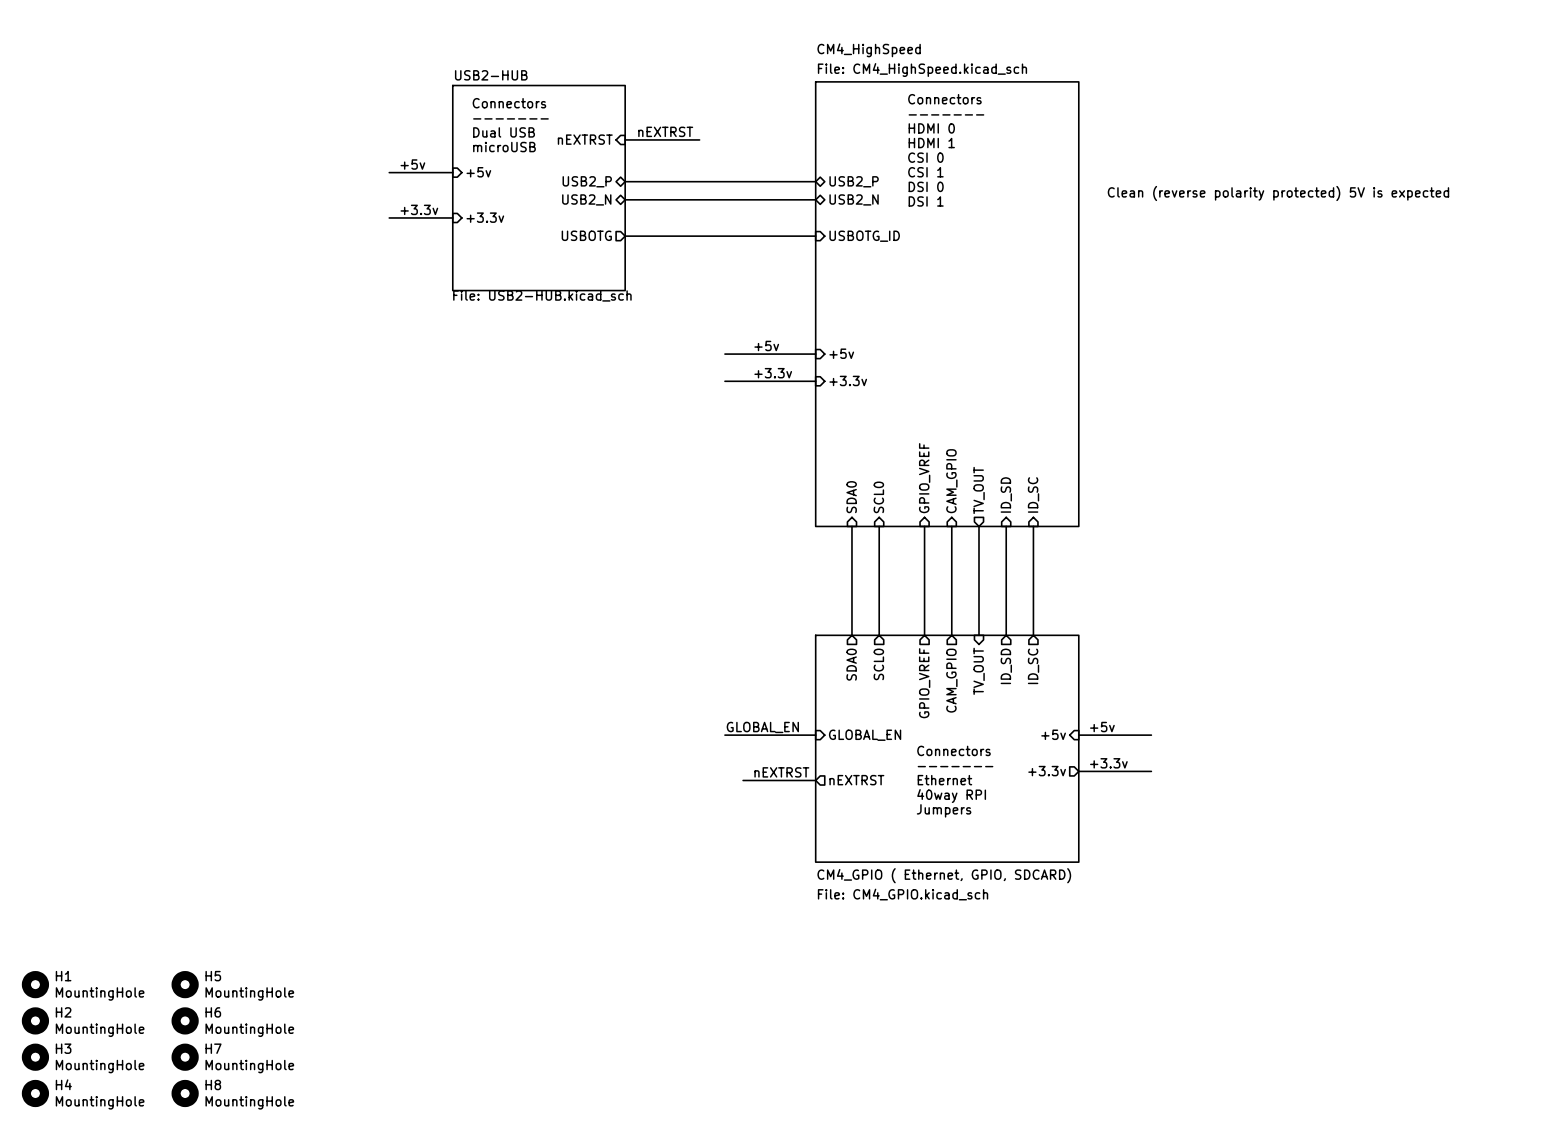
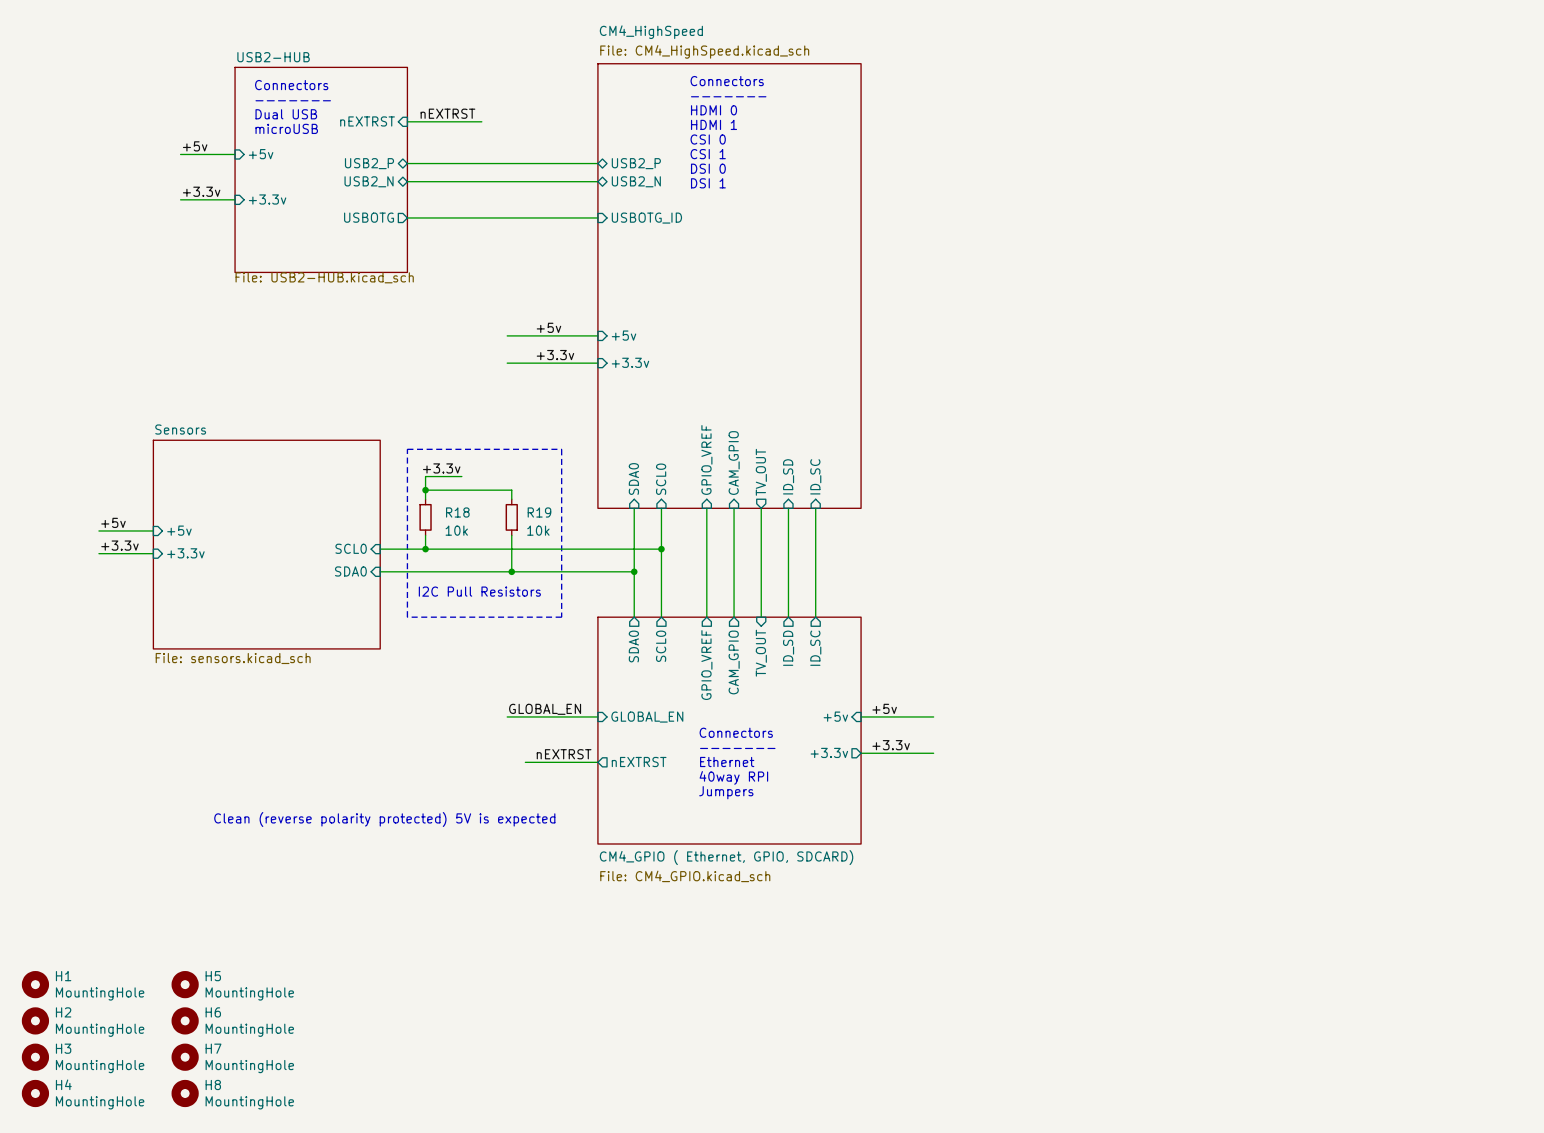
text: none -> Connectors (727, 81)
text: none -> Connectors (291, 85)
text: none -> ------- (728, 96)
text: Connectors (944, 99) -> none
text: none -> ------- (293, 100)
text: Connectors (509, 103) -> none
text: none -> HDMI 0 (714, 110)
label: none -> nEXTRST (447, 113)
text: none -> Dual USB (286, 114)
text: ------- (946, 114) -> none
text: ------- (510, 118) -> none
sheet pin: none -> nEXTRST (367, 121)
wire: none -> (407, 121) (481, 121)
text: none -> HDMI 1 (714, 124)
text: none -> microUSB (286, 128)
text: HDMI 0 (931, 128) -> none
label: nEXTRST (665, 131) -> none
text: Dual USB (504, 132) -> none
sheet pin: nEXTRST (585, 139) -> none
wire: (625, 139) (699, 139) -> none
text: none -> CSI 0 (708, 139)
text: HDMI 1 (931, 143) -> none
label: none -> +5v (195, 146)
text: microUSB (504, 147) -> none
wire: none -> (180, 154) (235, 154)
sheet pin: none -> +5v (261, 154)
text: none -> CSI 1 (708, 154)
text: CSI 0 (925, 157) -> none
sheet pin: none -> USB2_P (369, 163)
wire: none -> (407, 163) (597, 163)
label: +5v (412, 164) -> none
text: none -> DSI 0 (708, 168)
wire: (389, 172) (452, 172) -> none
sheet pin: +5v (478, 172) -> none
text: CSI 1 (925, 172) -> none
sheet pin: none -> USB2_N (369, 181)
wire: none -> (407, 181) (597, 181)
sheet pin rotation: 0° (587, 181) -> 180° (636, 163)
wire: (625, 181) (815, 181) -> none
sheet pin: USB2_P (854, 181) -> none
text: none -> DSI 1 (708, 183)
text: DSI 0 (926, 186) -> none
sheet USB2-HUB position: (538, 188) -> (321, 169)
label: none -> +3.3v (201, 191)
text: Clean (reverse polarity protected) 5V is expected (1278, 193) -> none
wire: none -> (180, 199) (235, 199)
sheet pin: none -> +3.3v (267, 199)
sheet pin rotation: 0° (586, 199) -> 180° (636, 181)
wire: (625, 199) (815, 199) -> none
sheet pin: USB2_N (854, 199) -> none
text: DSI 1 (926, 201) -> none
label: +3.3v (419, 209) -> none
sheet pin: none -> USBOTG (369, 217)
wire: (389, 217) (407, 217) -> none
wire: none -> (452, 217) (597, 217)
sheet pin: +3.3v (485, 217) -> none
sheet pin shape: output (586, 235) -> input (646, 218)
sheet pin: USBOTG (586, 235) -> USBOTG_ID (646, 218)
wire: (625, 236) (815, 236) -> none
sheet pin: USBOTG_ID (864, 236) -> none
sheet CM4_HighSpeed position: (947, 304) -> (729, 286)
label: none -> +5v (548, 327)
wire: none -> (507, 335) (597, 335)
sheet pin: none -> +5v (624, 335)
label: +5v (766, 345) -> none
sheet pin: +5v (841, 353) -> none
wire: (724, 354) (815, 354) -> none
label: none -> +3.3v (555, 355)
sheet pin: none -> +3.3v (630, 362)
wire: none -> (507, 363) (597, 363)
label: +3.3v (773, 373) -> none
sheet pin: +3.3v (848, 380) -> none
wire: (724, 381) (815, 381) -> none
line: none -> (407, 449) (561, 449) (561, 617) (407, 617) (407, 449)
sheet pin: none -> GPIO_VREF (706, 459)
sheet pin: none -> CAM_GPIO (734, 463)
label: none -> +3.3v (441, 468)
sheet pin: none -> TV_OUT (761, 472)
wire: none -> (461, 476) (425, 476) (425, 499)
sheet pin: none -> ID_SD (788, 476)
sheet pin: none -> ID_SC (815, 476)
sheet pin: GPIO_VREF (924, 478) -> none
sheet pin: none -> SDA0 (633, 479)
sheet pin: none -> SCL0 (661, 479)
sheet pin: CAM_GPIO (951, 481) -> none
wire: none -> (425, 490) (511, 490) (511, 499)
junction: none -> (425, 490)
sheet pin: TV_OUT (979, 490) -> none
sheet pin: ID_SD (1006, 494) -> none
sheet pin: ID_SC (1033, 494) -> none
sheet pin: SDA0 (851, 497) -> none
sheet pin: SCL0 (878, 497) -> none
wire: none -> (634, 508) (634, 617)
wire: none -> (661, 508) (661, 617)
R18: none -> 10k (425, 517)
R19: none -> 10k (511, 517)
label: none -> +5v (113, 522)
wire: (851, 526) (851, 635) -> (734, 508) (734, 617)
wire: (879, 526) (879, 635) -> (706, 508) (706, 617)
wire: (924, 526) (924, 635) -> (761, 508) (761, 617)
wire: (951, 526) (951, 635) -> (788, 508) (788, 617)
wire: (979, 526) (979, 635) -> (815, 508) (815, 617)
wire: (1006, 526) (1006, 635) -> none
wire: (1033, 526) (1033, 635) -> none
wire: none -> (98, 530) (153, 530)
sheet pin: none -> +5v (179, 530)
wire: none -> (425, 535) (425, 549)
wire: none -> (511, 535) (511, 571)
sheet Sensors: none -> File: sensors.kicad_sch (266, 544)
label: none -> +3.3v (119, 545)
sheet pin: none -> SCL0 (351, 548)
wire: none -> (380, 549) (661, 549)
junction: none -> (425, 549)
junction: none -> (661, 549)
wire: none -> (98, 553) (153, 553)
sheet pin: none -> +3.3v (185, 553)
sheet pin: none -> SDA0 (350, 571)
wire: none -> (380, 571) (634, 571)
junction: none -> (511, 571)
junction: none -> (634, 571)
text: none -> I2C Pull Resistors (479, 591)
sheet pin: none -> SDA0 (633, 646)
sheet pin: none -> SCL0 (661, 646)
sheet pin: none -> ID_SD (788, 648)
sheet pin: none -> ID_SC (815, 648)
sheet pin: none -> TV_OUT (761, 653)
sheet pin: none -> CAM_GPIO (734, 662)
sheet pin: SDA0 (851, 664) -> none
sheet pin: SCL0 (878, 664) -> none
sheet pin: none -> GPIO_VREF (706, 665)
sheet pin: ID_SD (1006, 666) -> none
sheet pin: ID_SC (1033, 666) -> none
sheet pin: TV_OUT (979, 671) -> none
sheet pin: CAM_GPIO (951, 680) -> none
sheet pin: GPIO_VREF (924, 683) -> none
label: none -> +5v (884, 708)
label: none -> GLOBAL_EN (545, 709)
wire: none -> (507, 716) (597, 716)
sheet pin: none -> +5v (835, 716)
wire: none -> (861, 716) (933, 716)
sheet pin: none -> GLOBAL_EN (647, 717)
label: GLOBAL_EN (762, 727) -> none
label: +5v (1102, 727) -> none
text: none -> Connectors (736, 732)
sheet pin: +5v (1053, 734) -> none
wire: (724, 735) (815, 735) -> none
sheet pin: GLOBAL_EN (865, 735) -> none
wire: (1078, 735) (1151, 735) -> none
label: none -> +3.3v (891, 745)
text: none -> ------- (737, 748)
sheet CM4_GPIO ( Ethernet, GPIO, SDCARD) position: (947, 748) -> (729, 730)
text: Connectors (954, 750) -> none
sheet pin: none -> +3.3v (829, 752)
label: none -> nEXTRST (564, 754)
text: none -> Ethernet (727, 761)
wire: none -> (525, 762) (597, 762)
sheet pin: none -> nEXTRST (639, 762)
label: +3.3v (1108, 763) -> none
text: ------- (955, 766) -> none
sheet pin: +3.3v (1047, 771) -> none
wire: (1078, 771) (1151, 771) -> none
label: nEXTRST (781, 772) -> none
text: none -> 40way RPI (733, 777)
wire: (743, 780) (815, 780) -> (861, 753) (933, 753)
sheet pin: nEXTRST (856, 780) -> none
text: Ethernet (944, 780) -> none
text: none -> Jumpers (726, 792)
text: 40way RPI (951, 796) -> none
text: Jumpers (944, 810) -> none
text: none -> Clean (reverse polarity protected) 5V is expected (384, 819)

